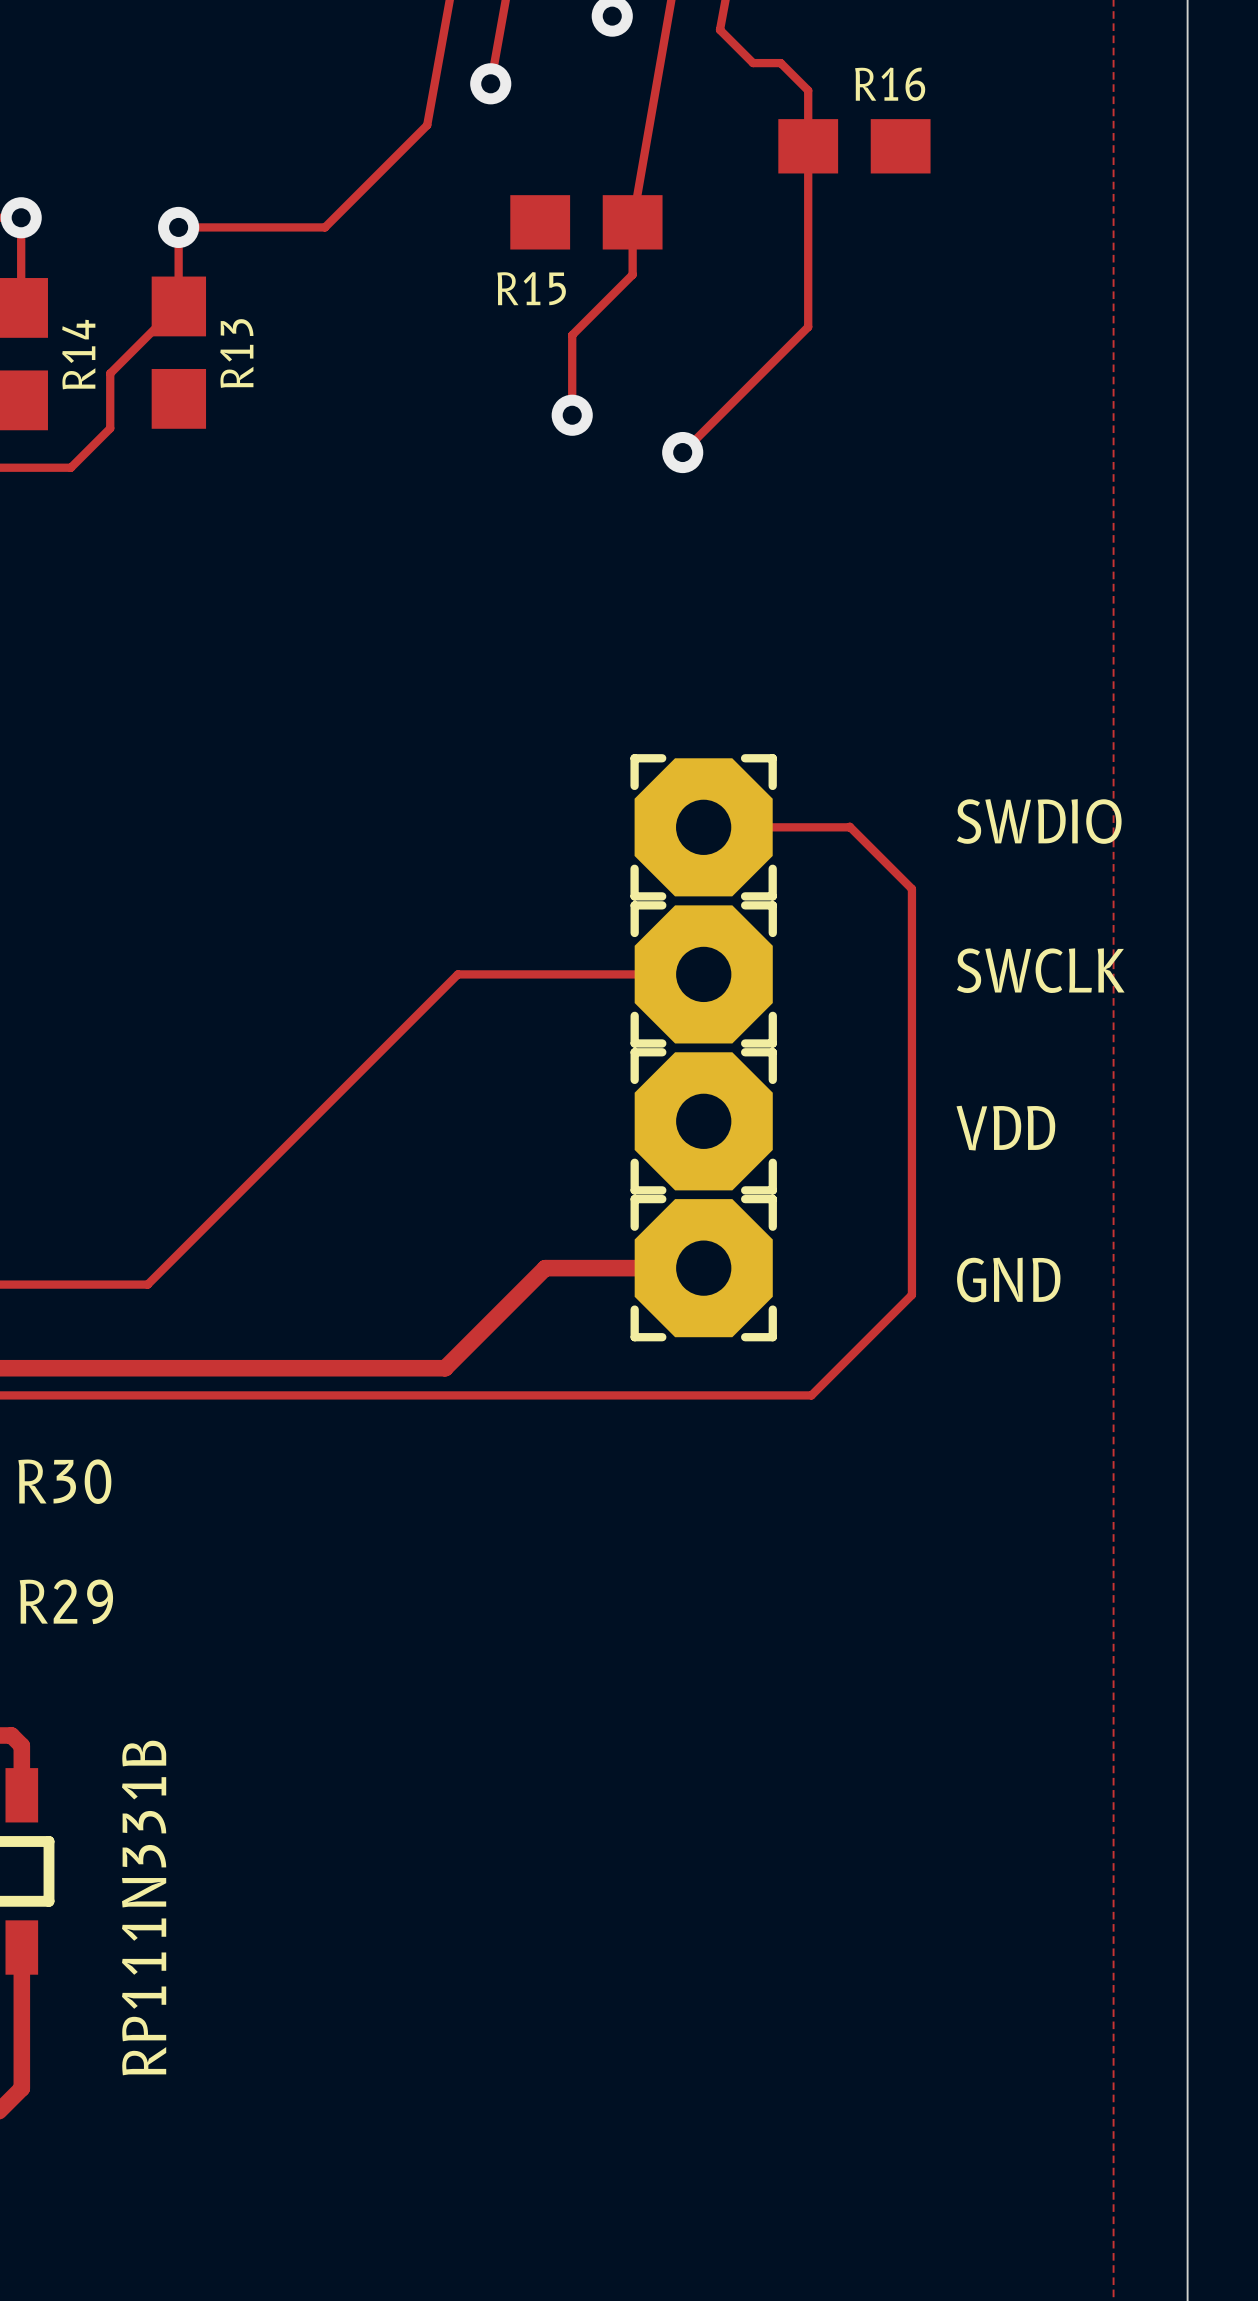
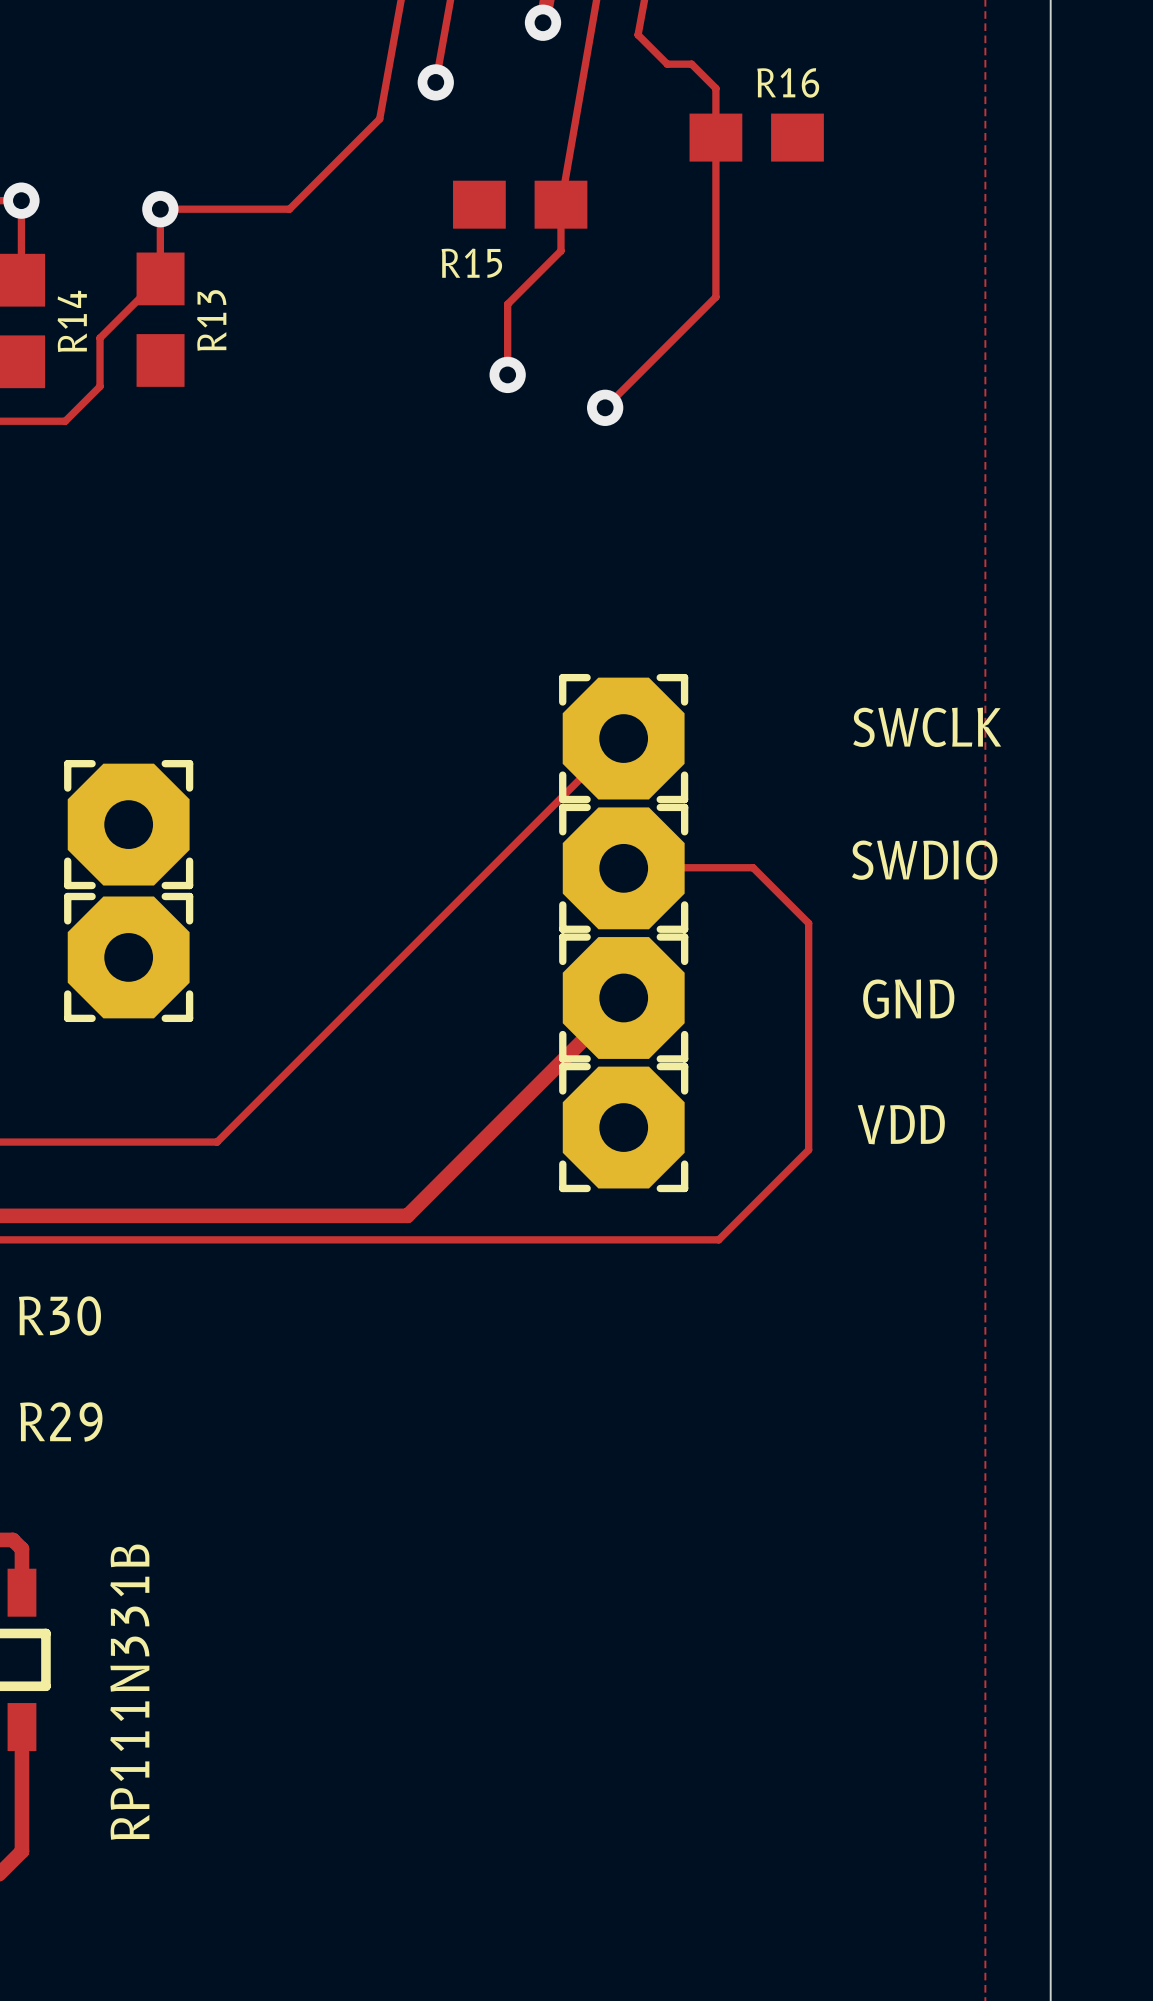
text: SWDIO (1039, 821) -> SWCLK (927, 727)
track: (849, 826) (911, 888) (911, 1294) -> (623, 867) (753, 867) (808, 923) (807, 1151)
track: (703, 827) (849, 827) -> none
part: none -> (128, 824)
text: SWCLK (1040, 970) -> SWDIO (924, 860)
track: (703, 974) (457, 974) (147, 1284) -> (623, 735) (217, 1142) (133, 1142)
part: none -> (128, 957)
text: VDD (1005, 1128) -> GND (908, 999)
track: (703, 1268) (545, 1268) (445, 1368) -> (623, 999) (407, 1215) (395, 1215)
text: GND (1008, 1280) -> VDD (901, 1124)

